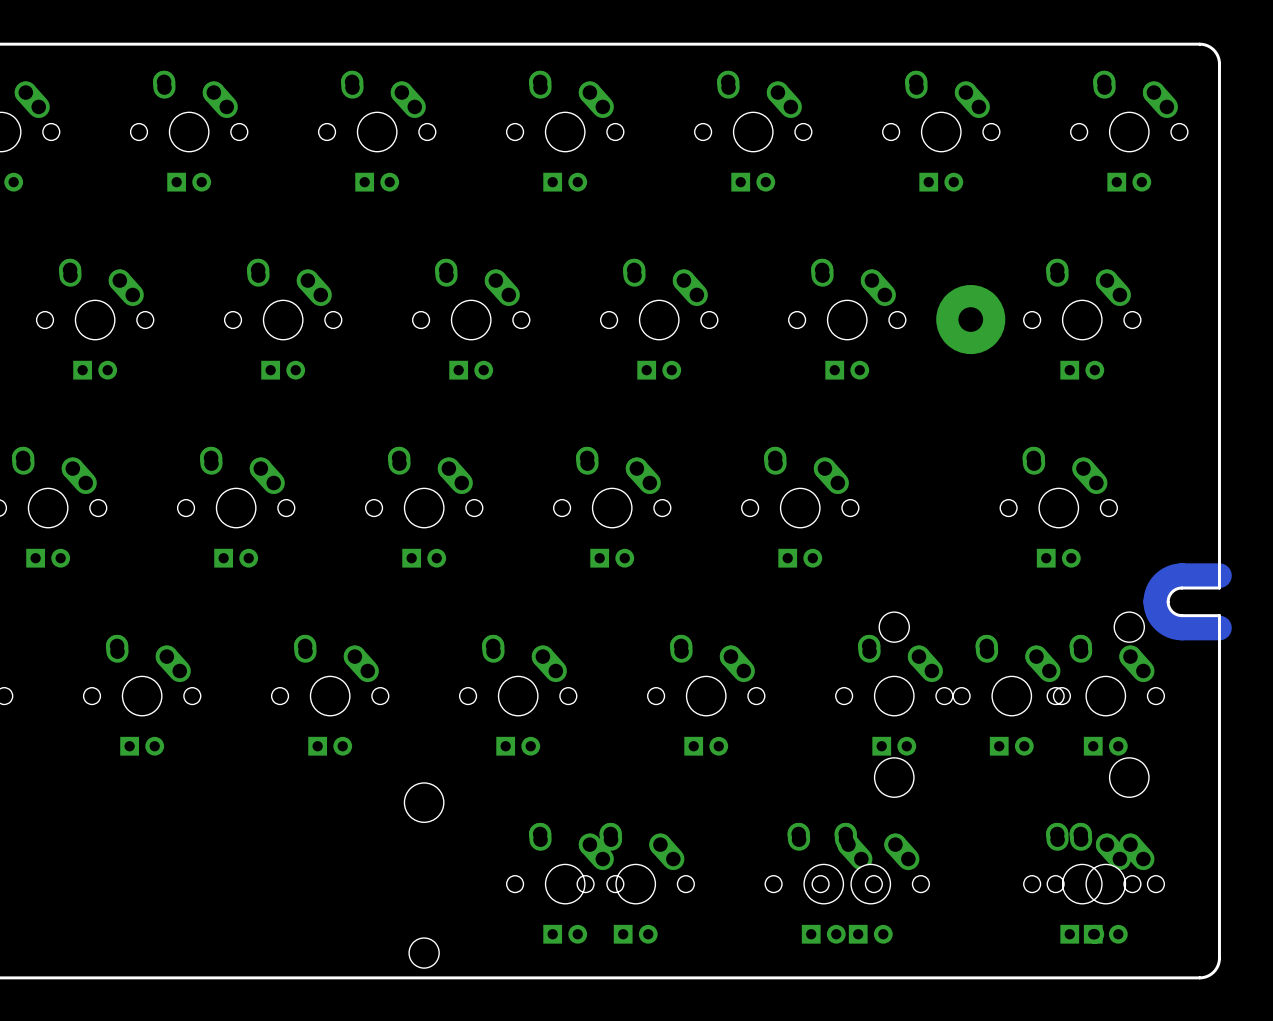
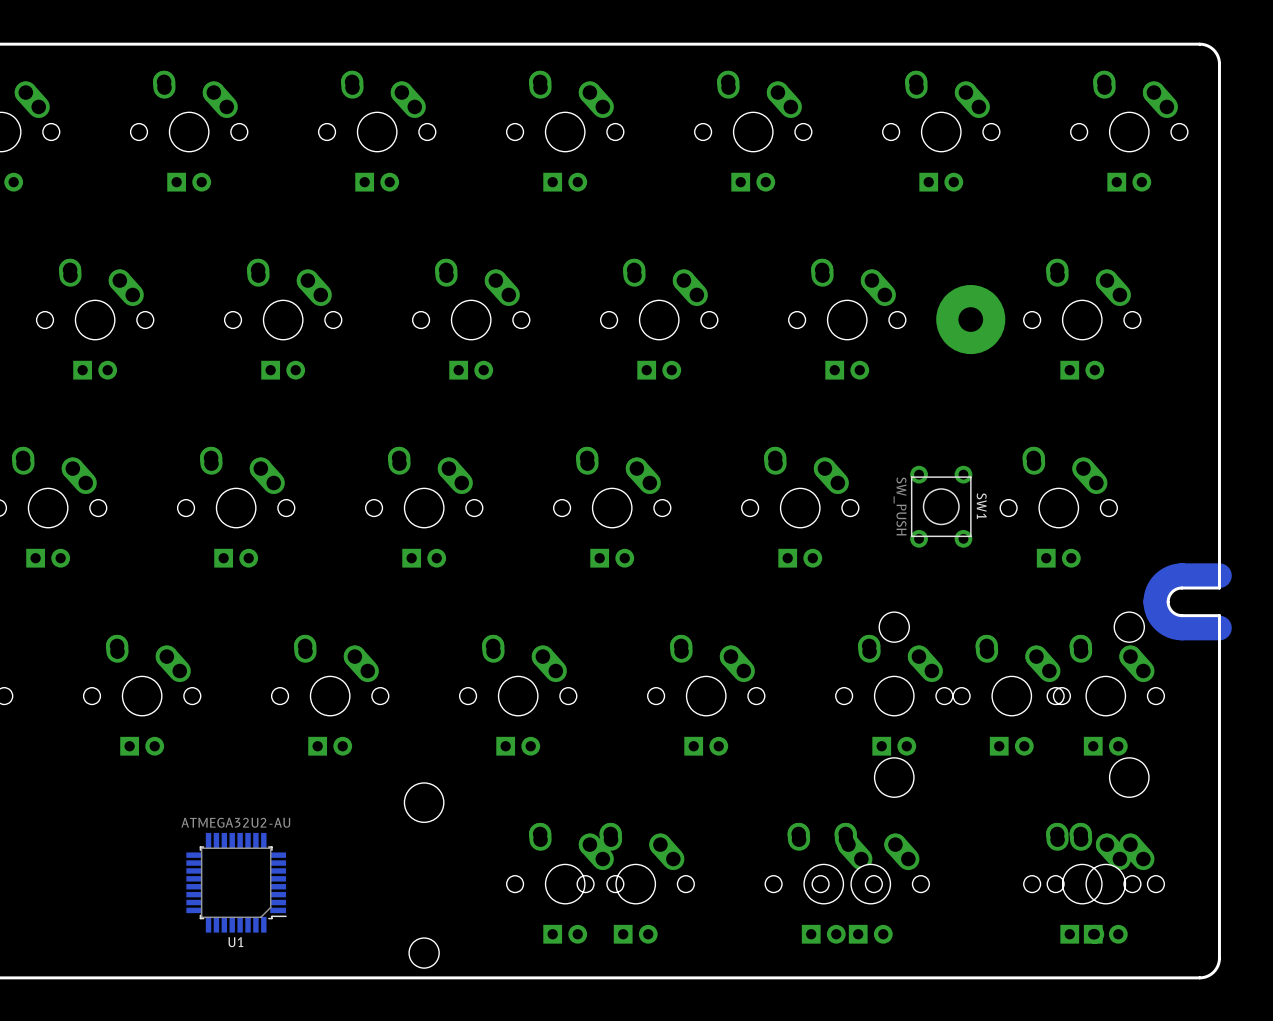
SW1: none -> SW_PUSH (941, 506)
U1: none -> ATMEGA32U2-AU (236, 882)

